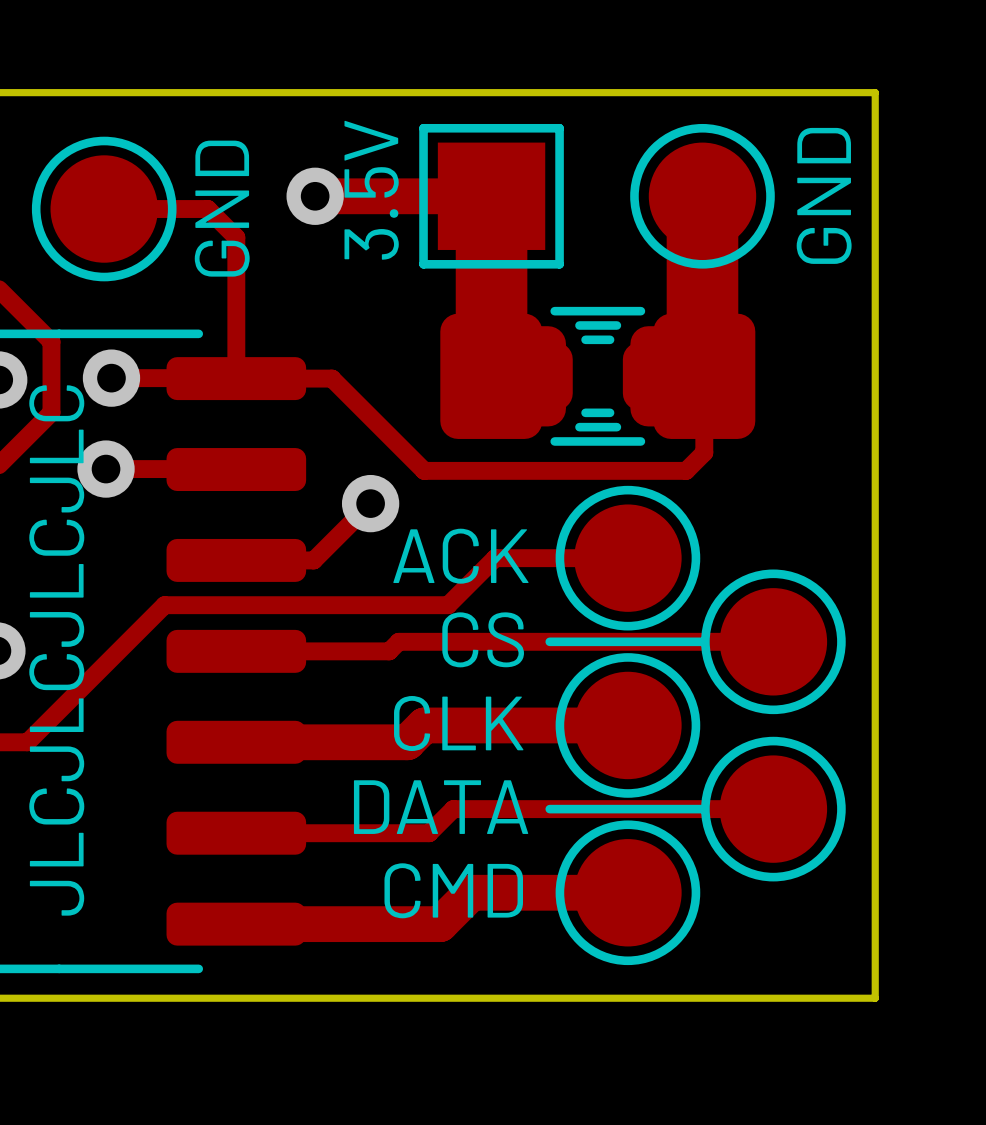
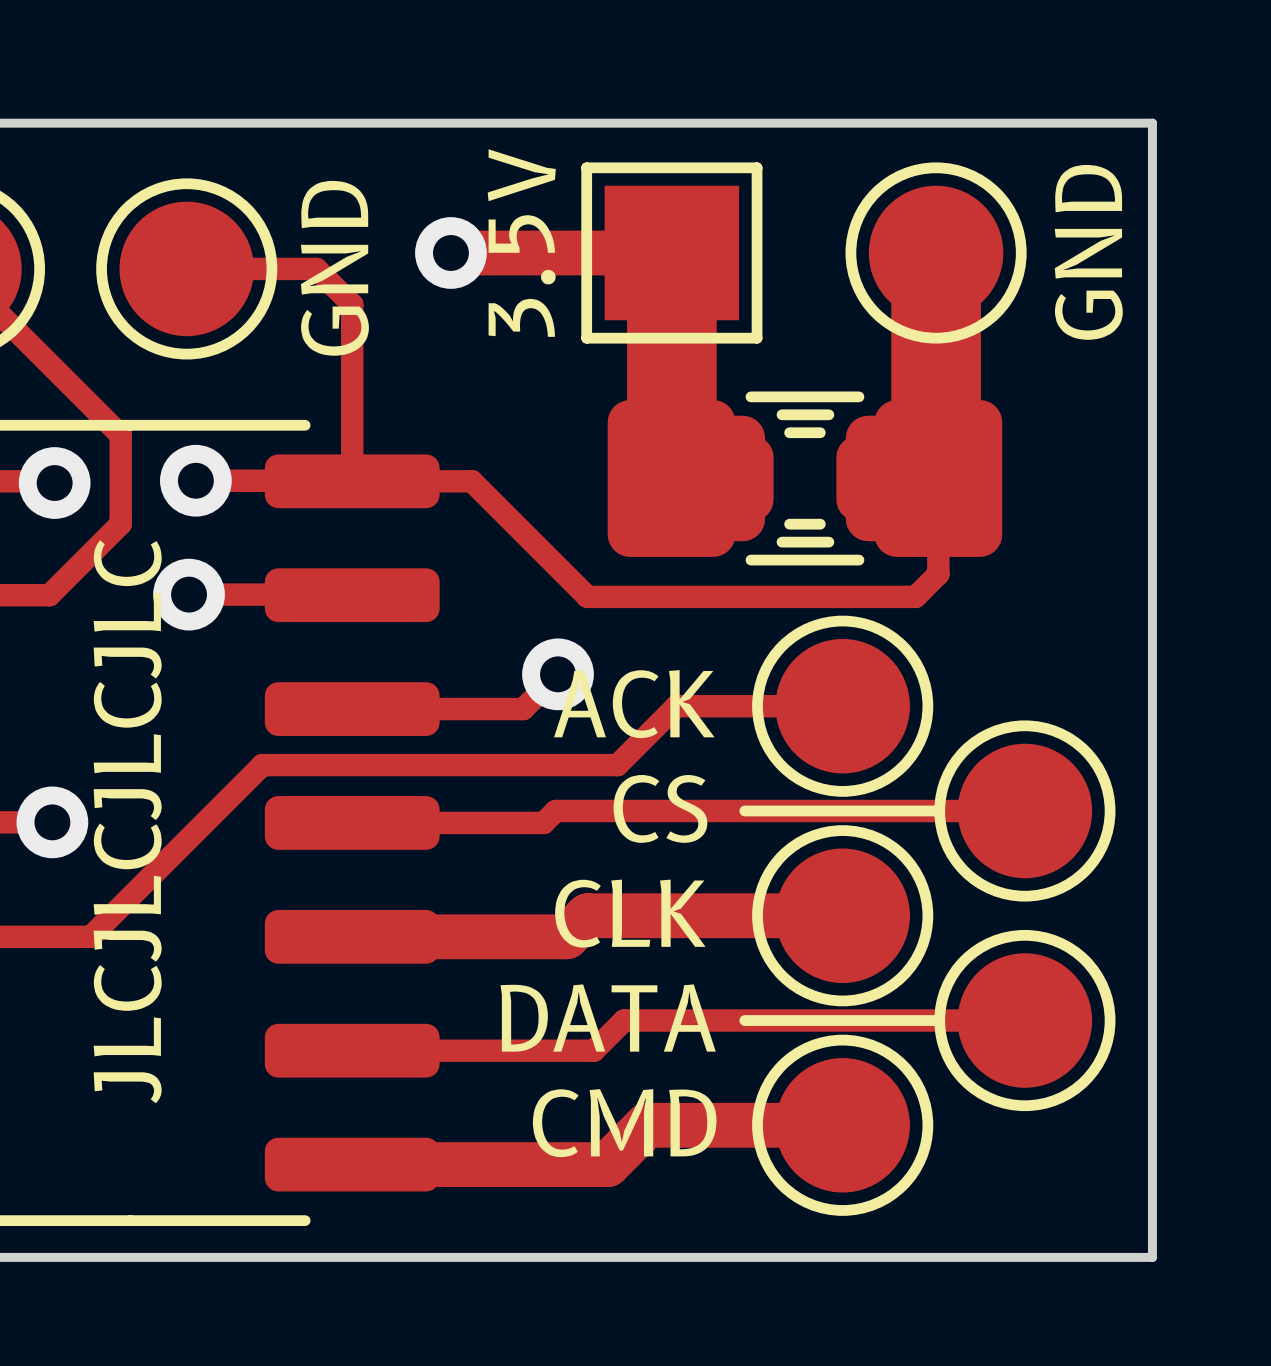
track: (370, 503) (313, 560) -> (558, 674) (523, 709) (449, 709)
via position: (370, 503) -> (558, 674)

